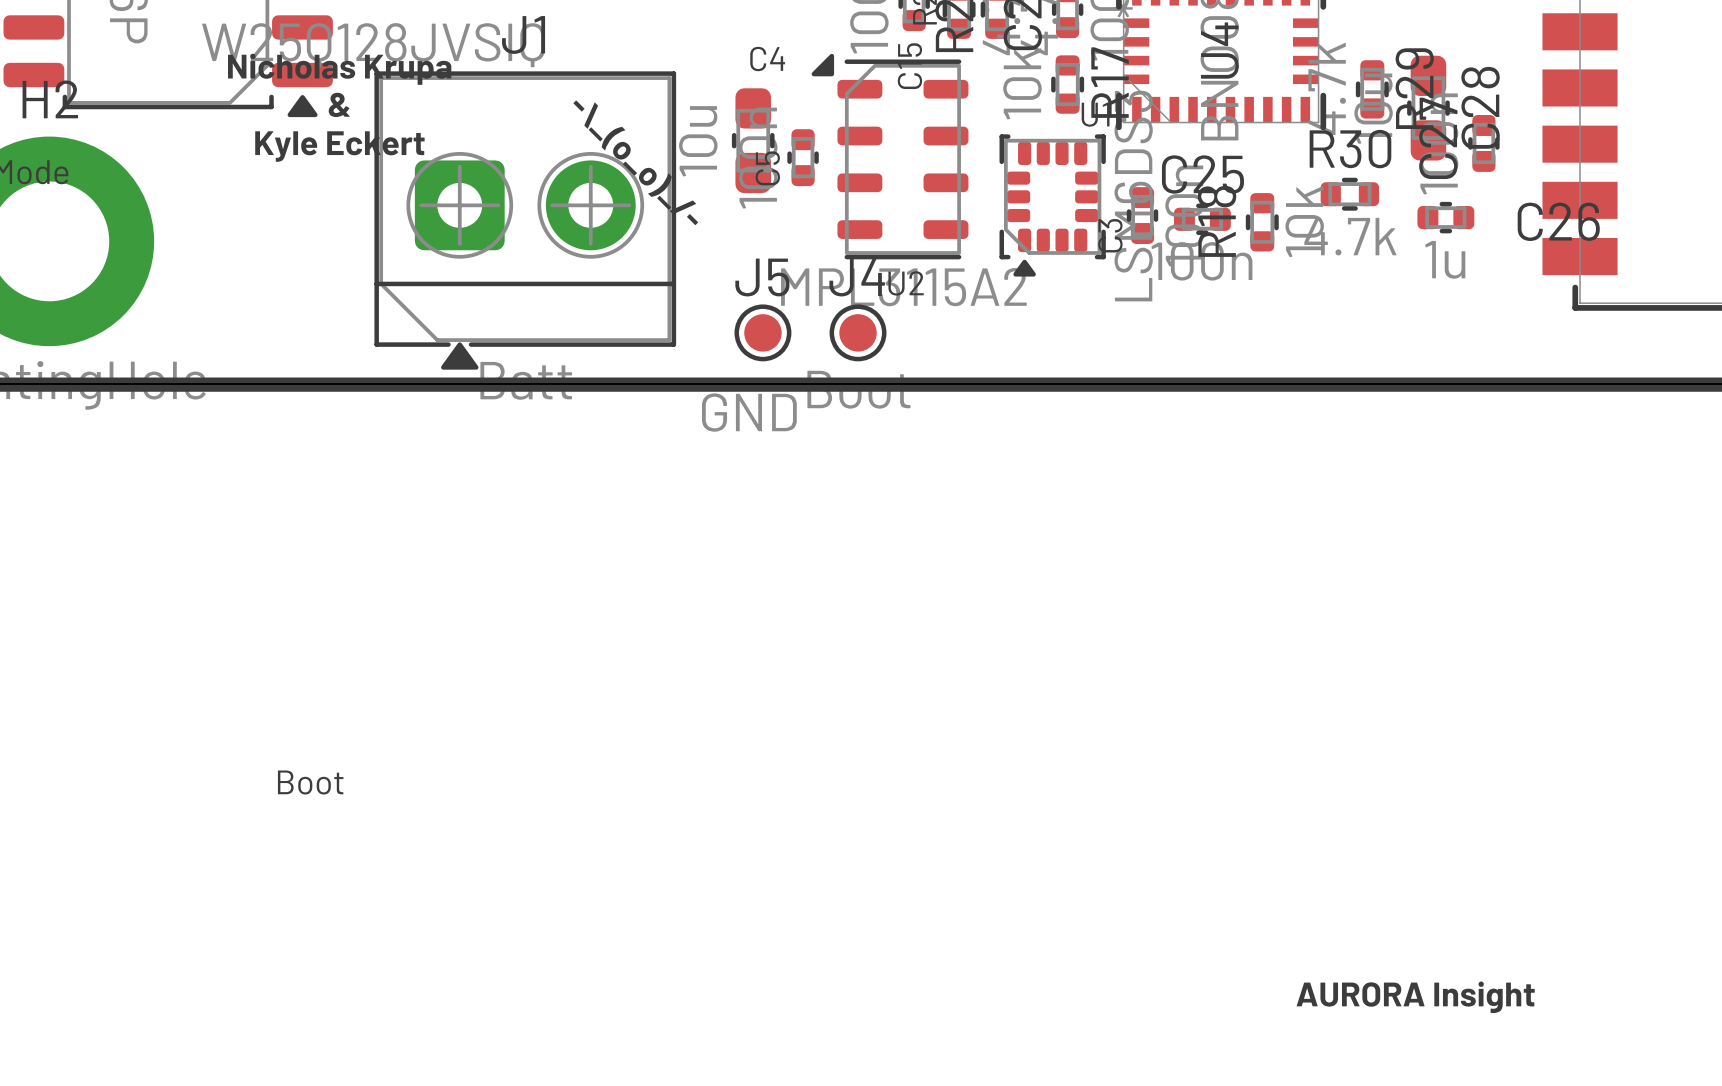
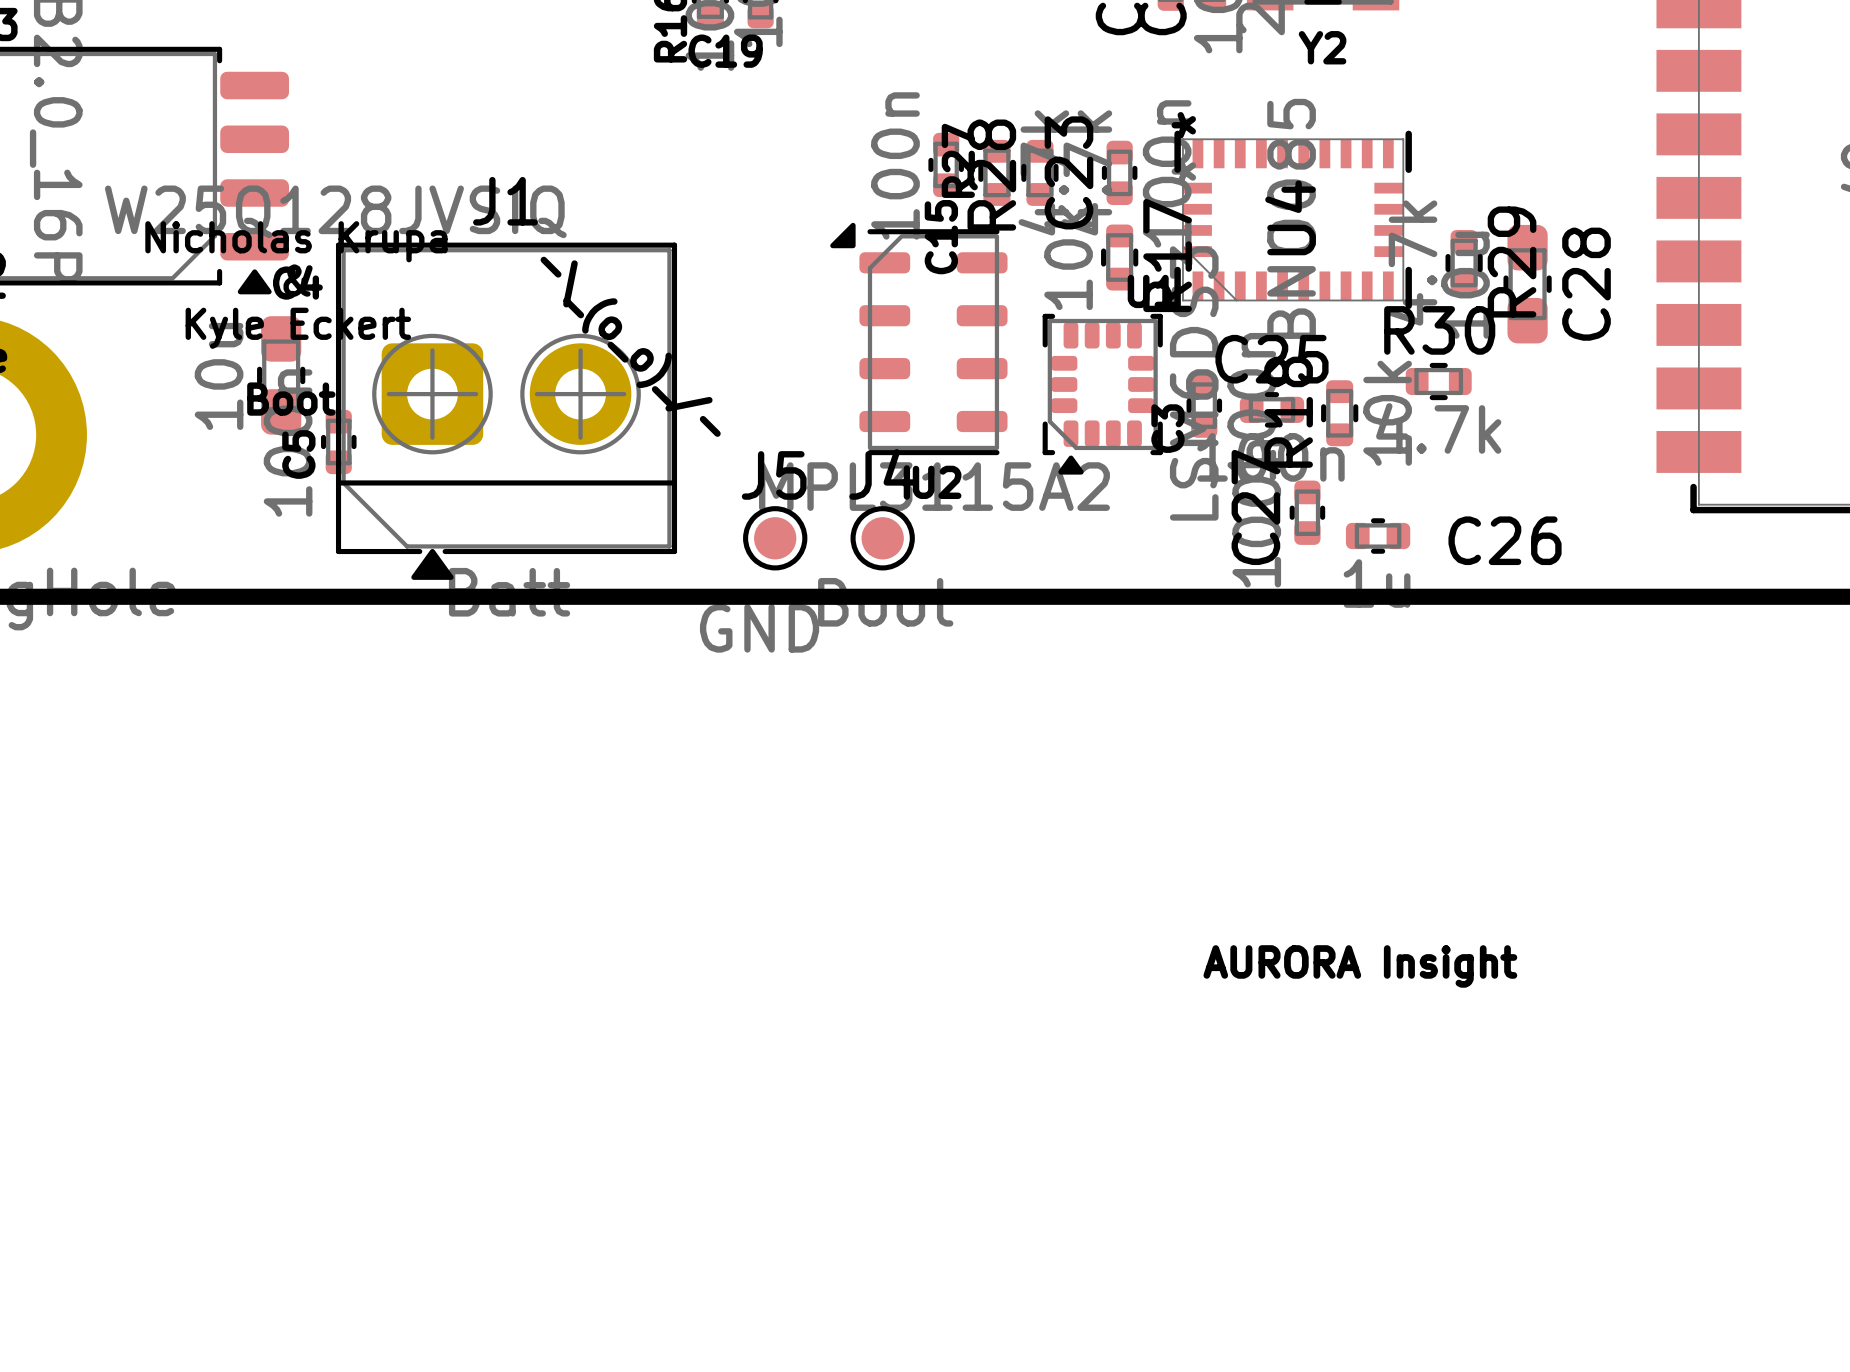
C4 position: (753, 140) -> (281, 375)
C27 position: (1483, 143) -> (1307, 512)
C5 position: (803, 157) -> (338, 442)
C26 position: (1445, 217) -> (1378, 536)
text position: Boot (310, 782) -> Boot (291, 399)
text position: AURORA Insight (1415, 997) -> AURORA Insight (1360, 966)

